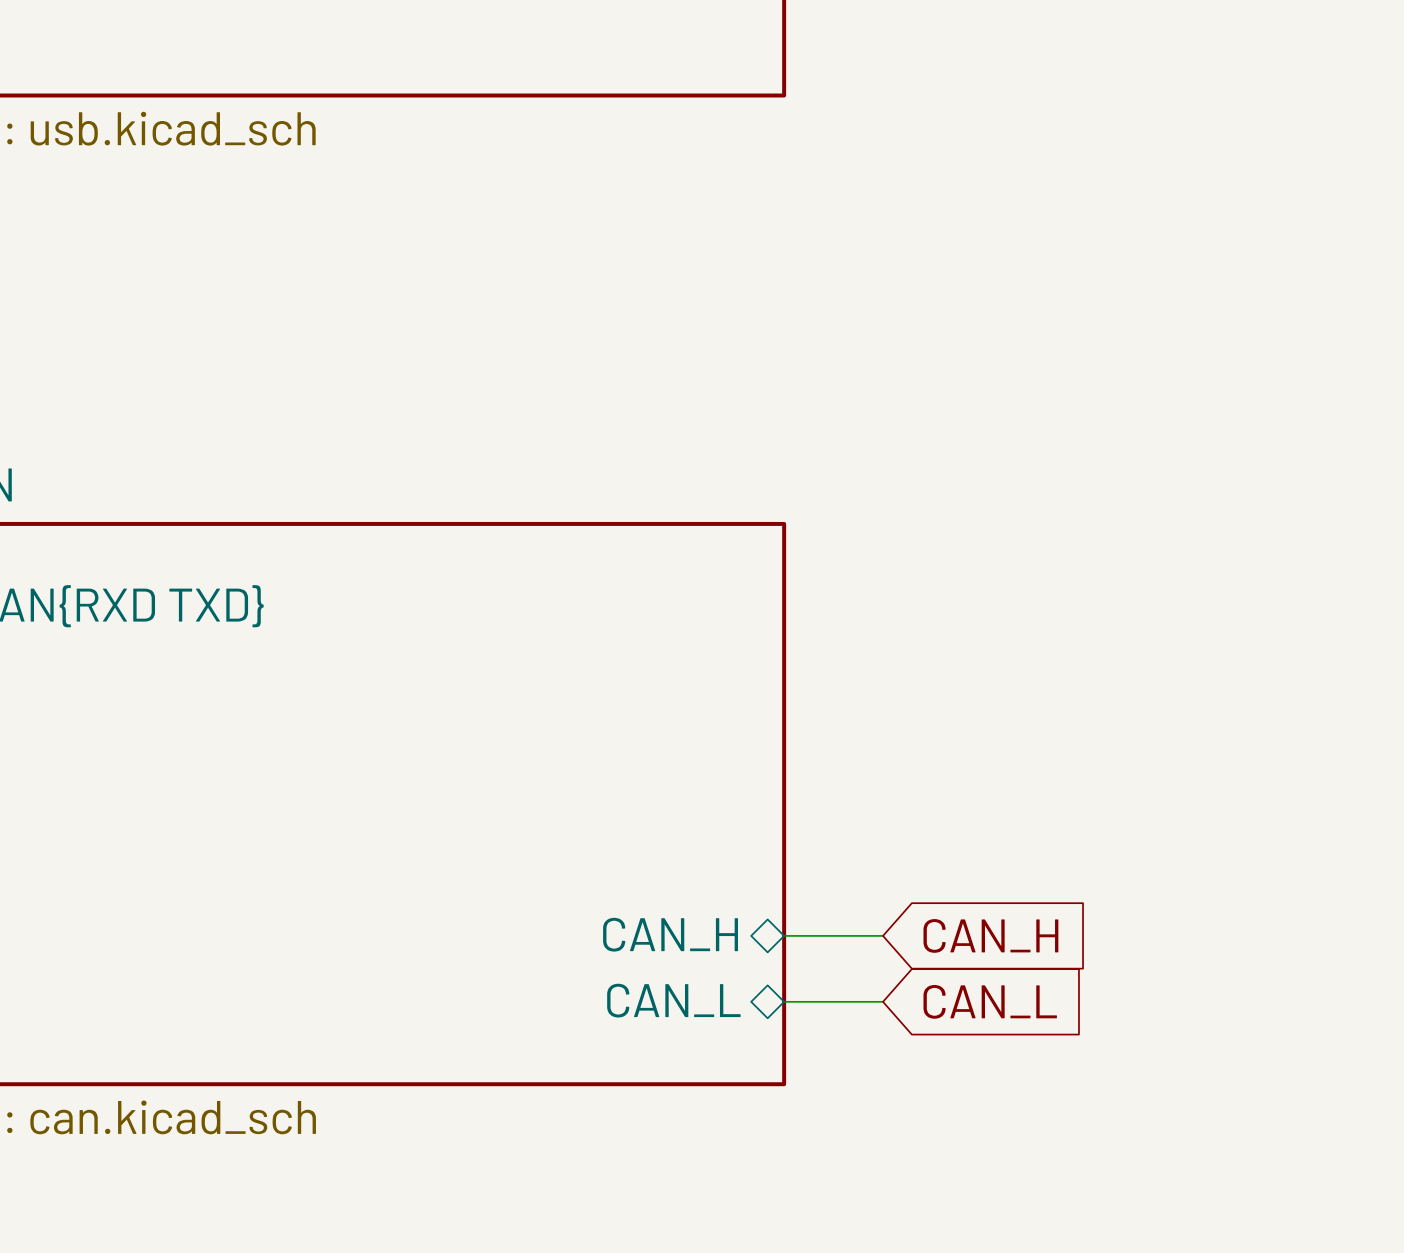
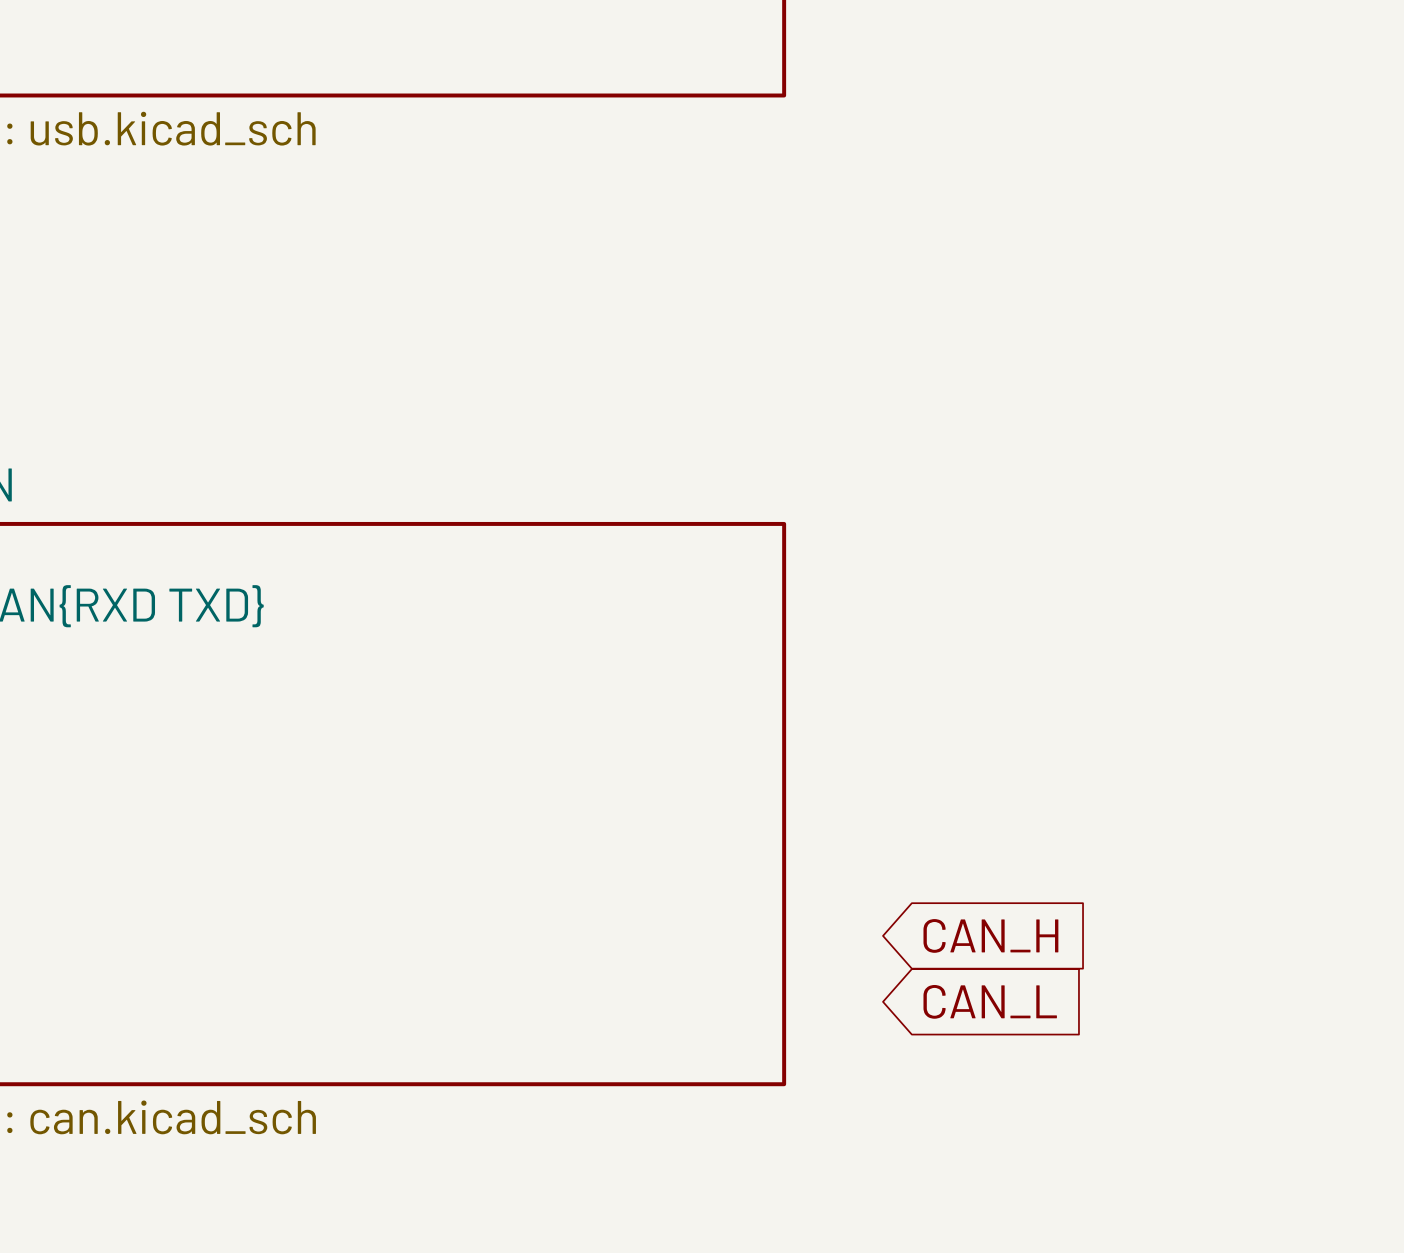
sheet pin: CAN_H (670, 934) -> none
wire: (784, 935) (883, 935) -> none
sheet pin: CAN_L (673, 1000) -> none
wire: (784, 1001) (883, 1001) -> none

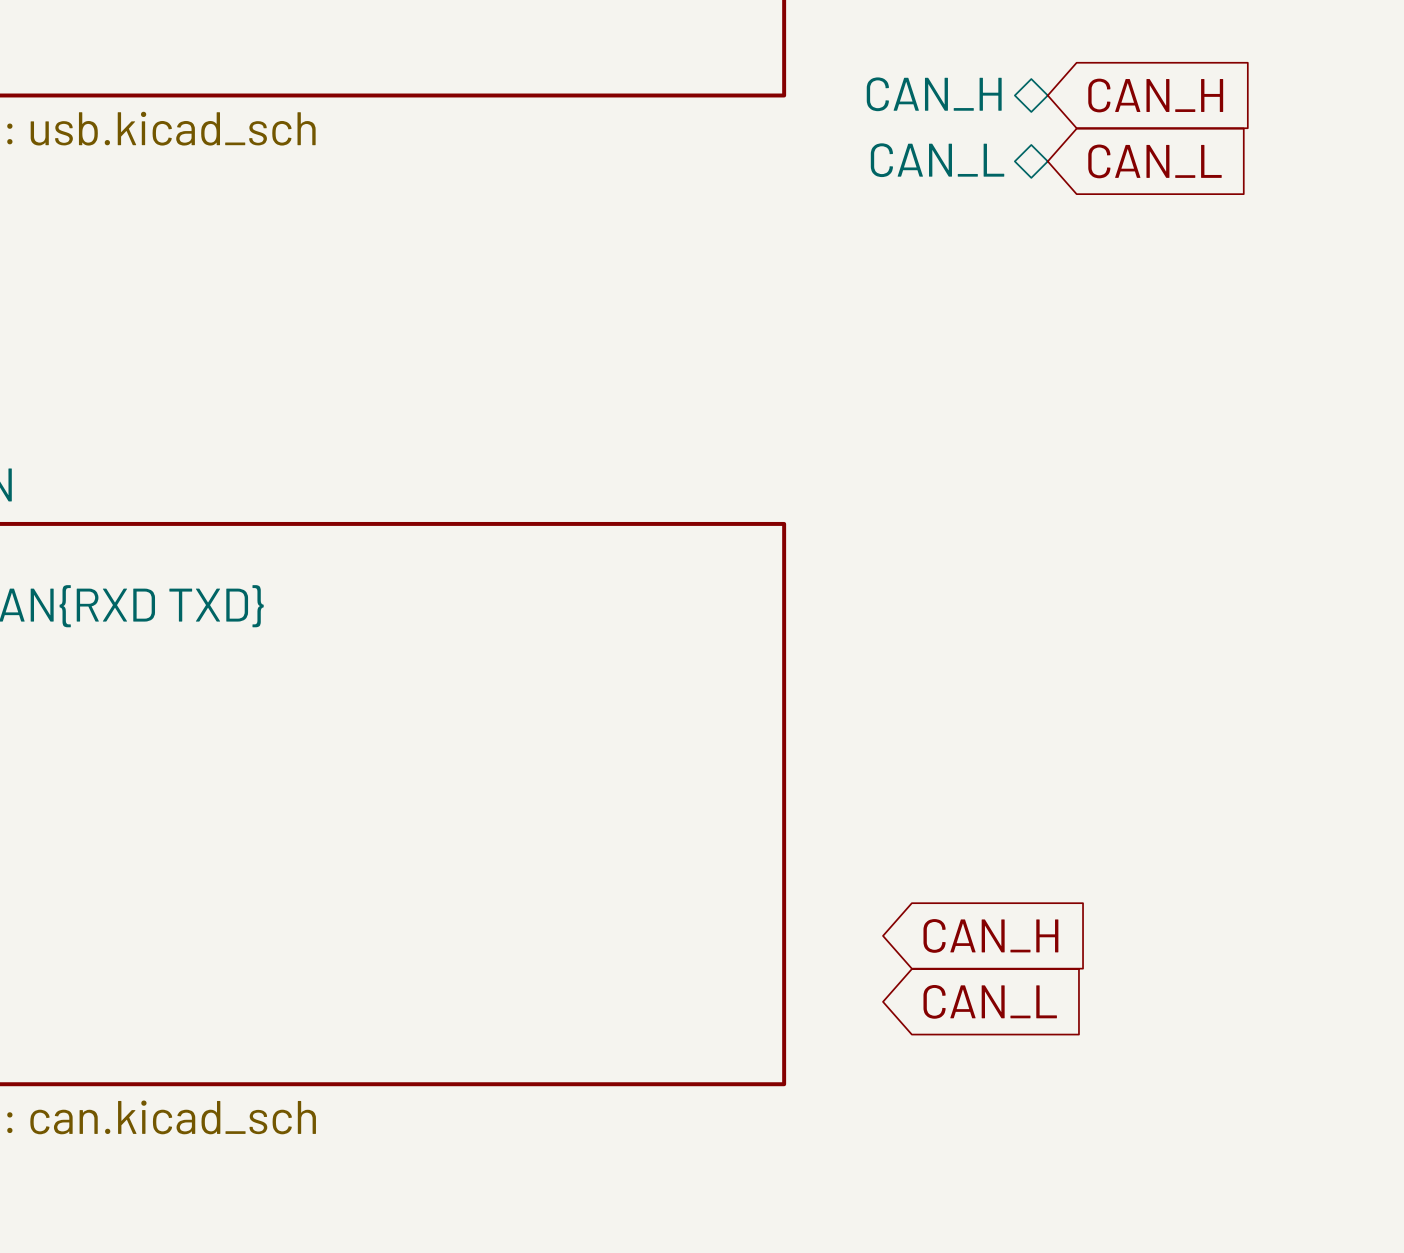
sheet pin: none -> CAN_H (934, 94)
global label: none -> CAN_H (1155, 95)
sheet pin: none -> CAN_L (937, 160)
global label: none -> CAN_L (1154, 161)

